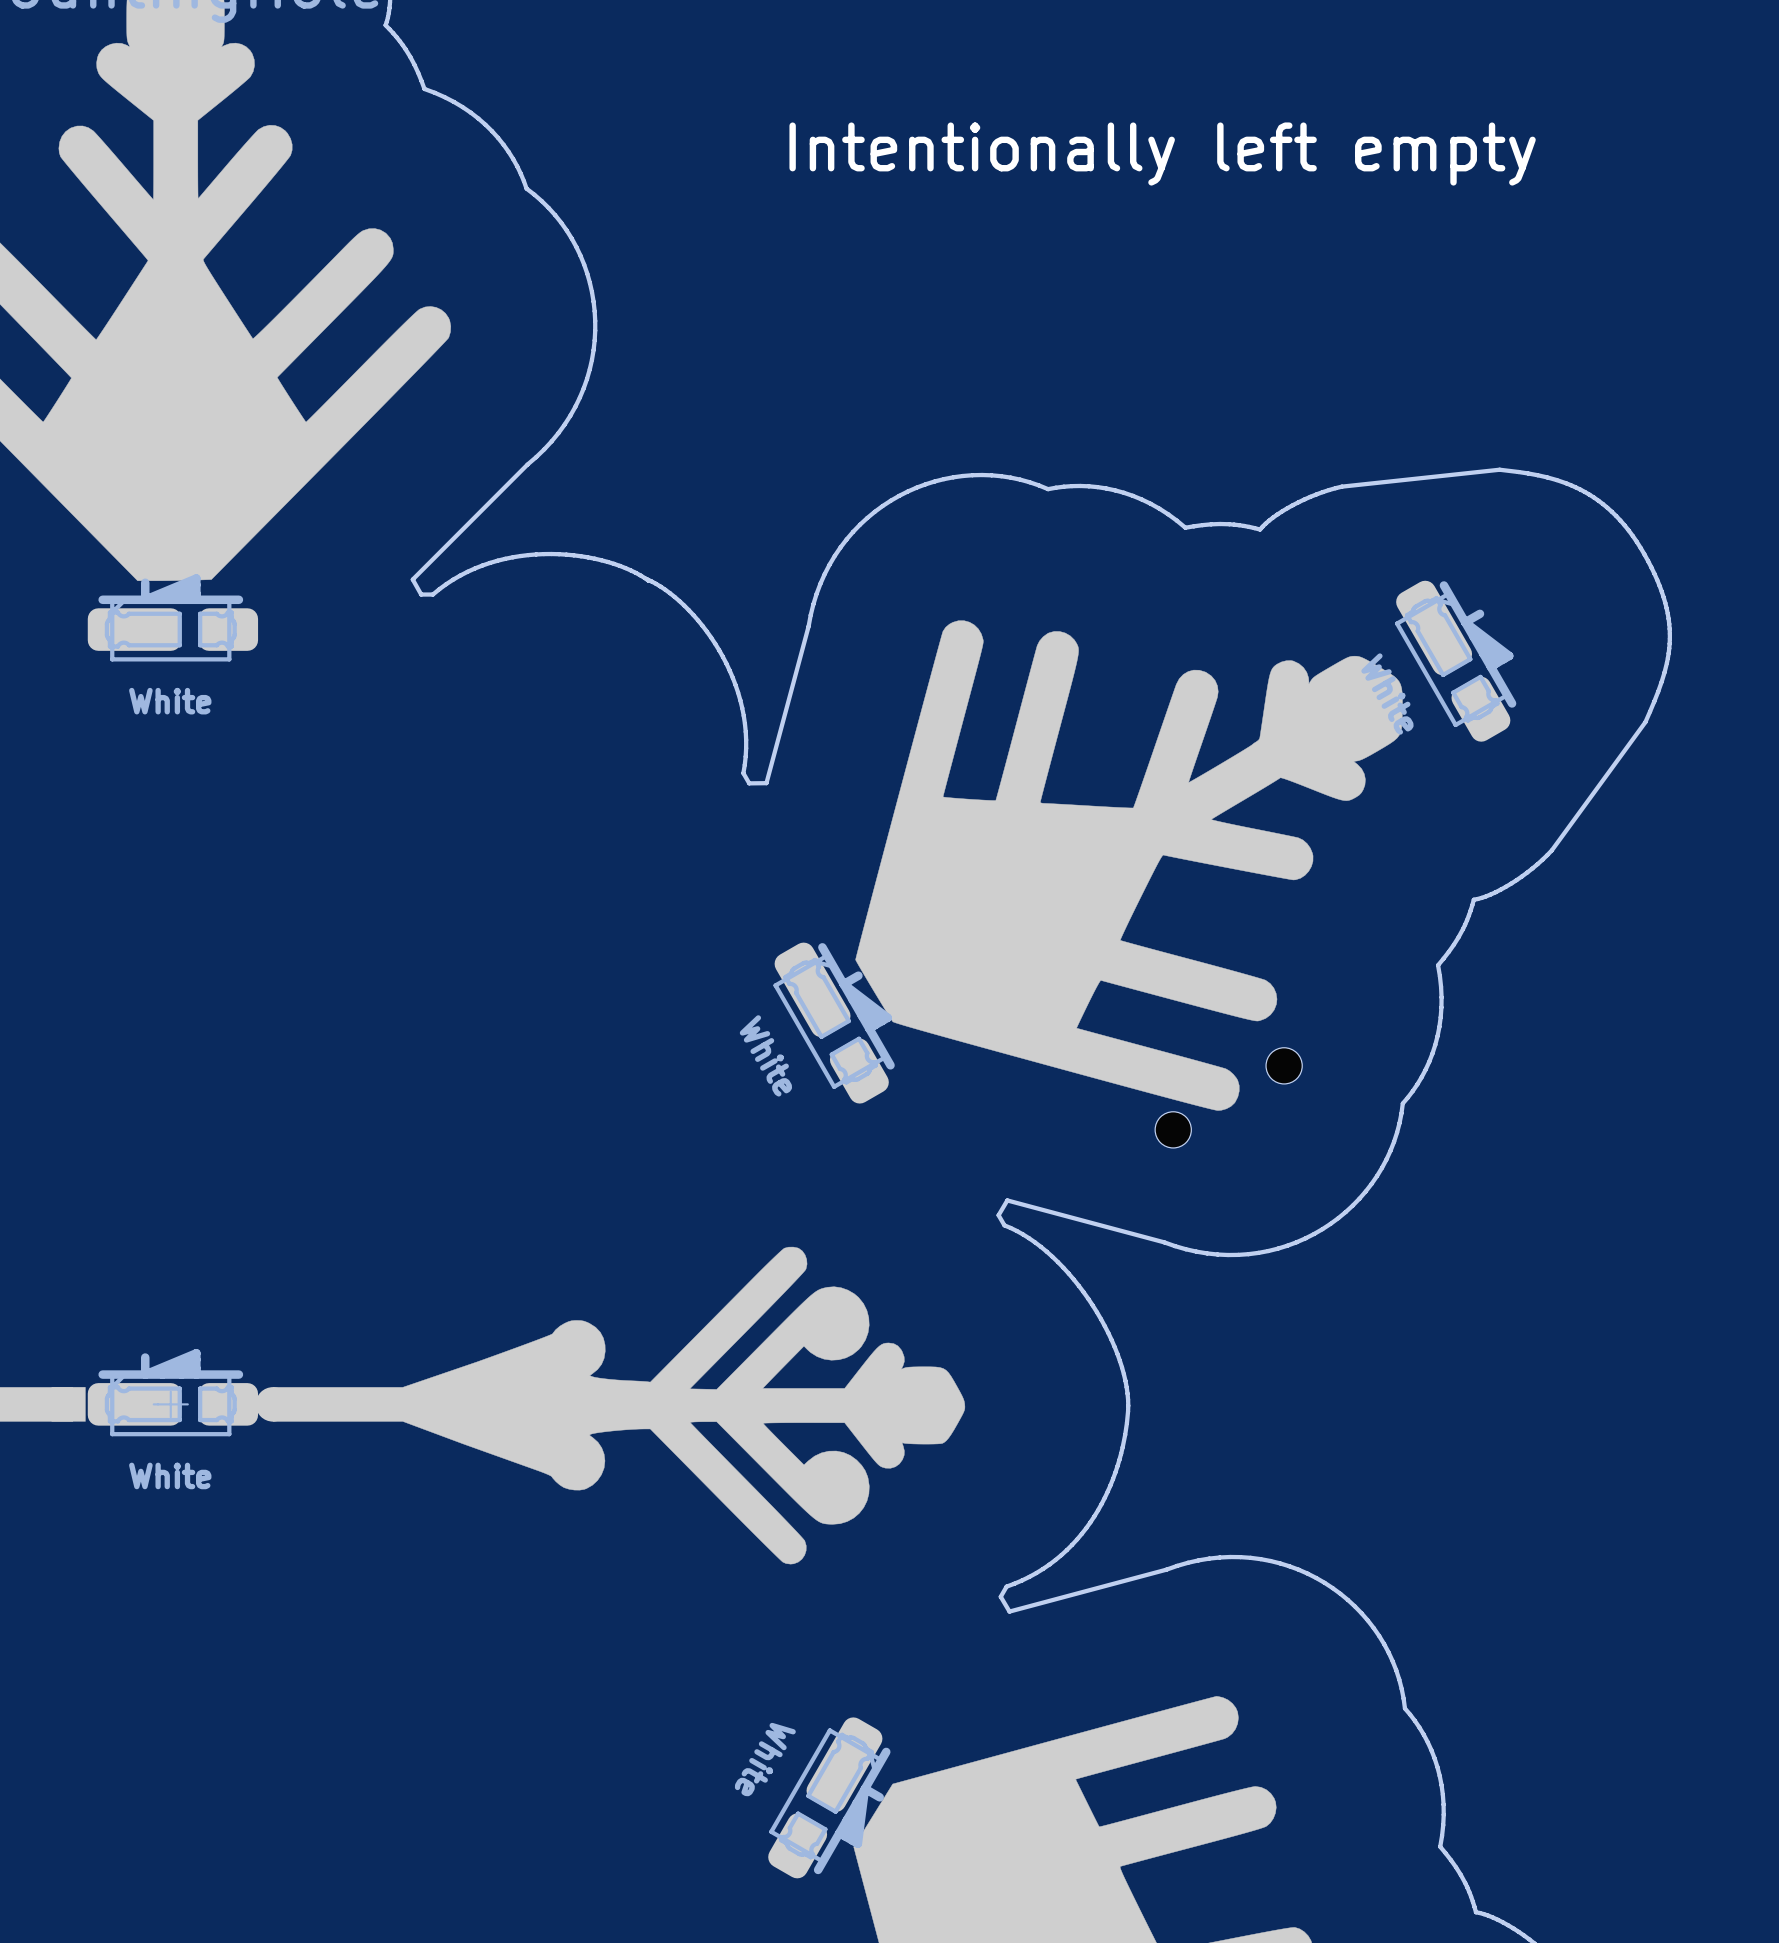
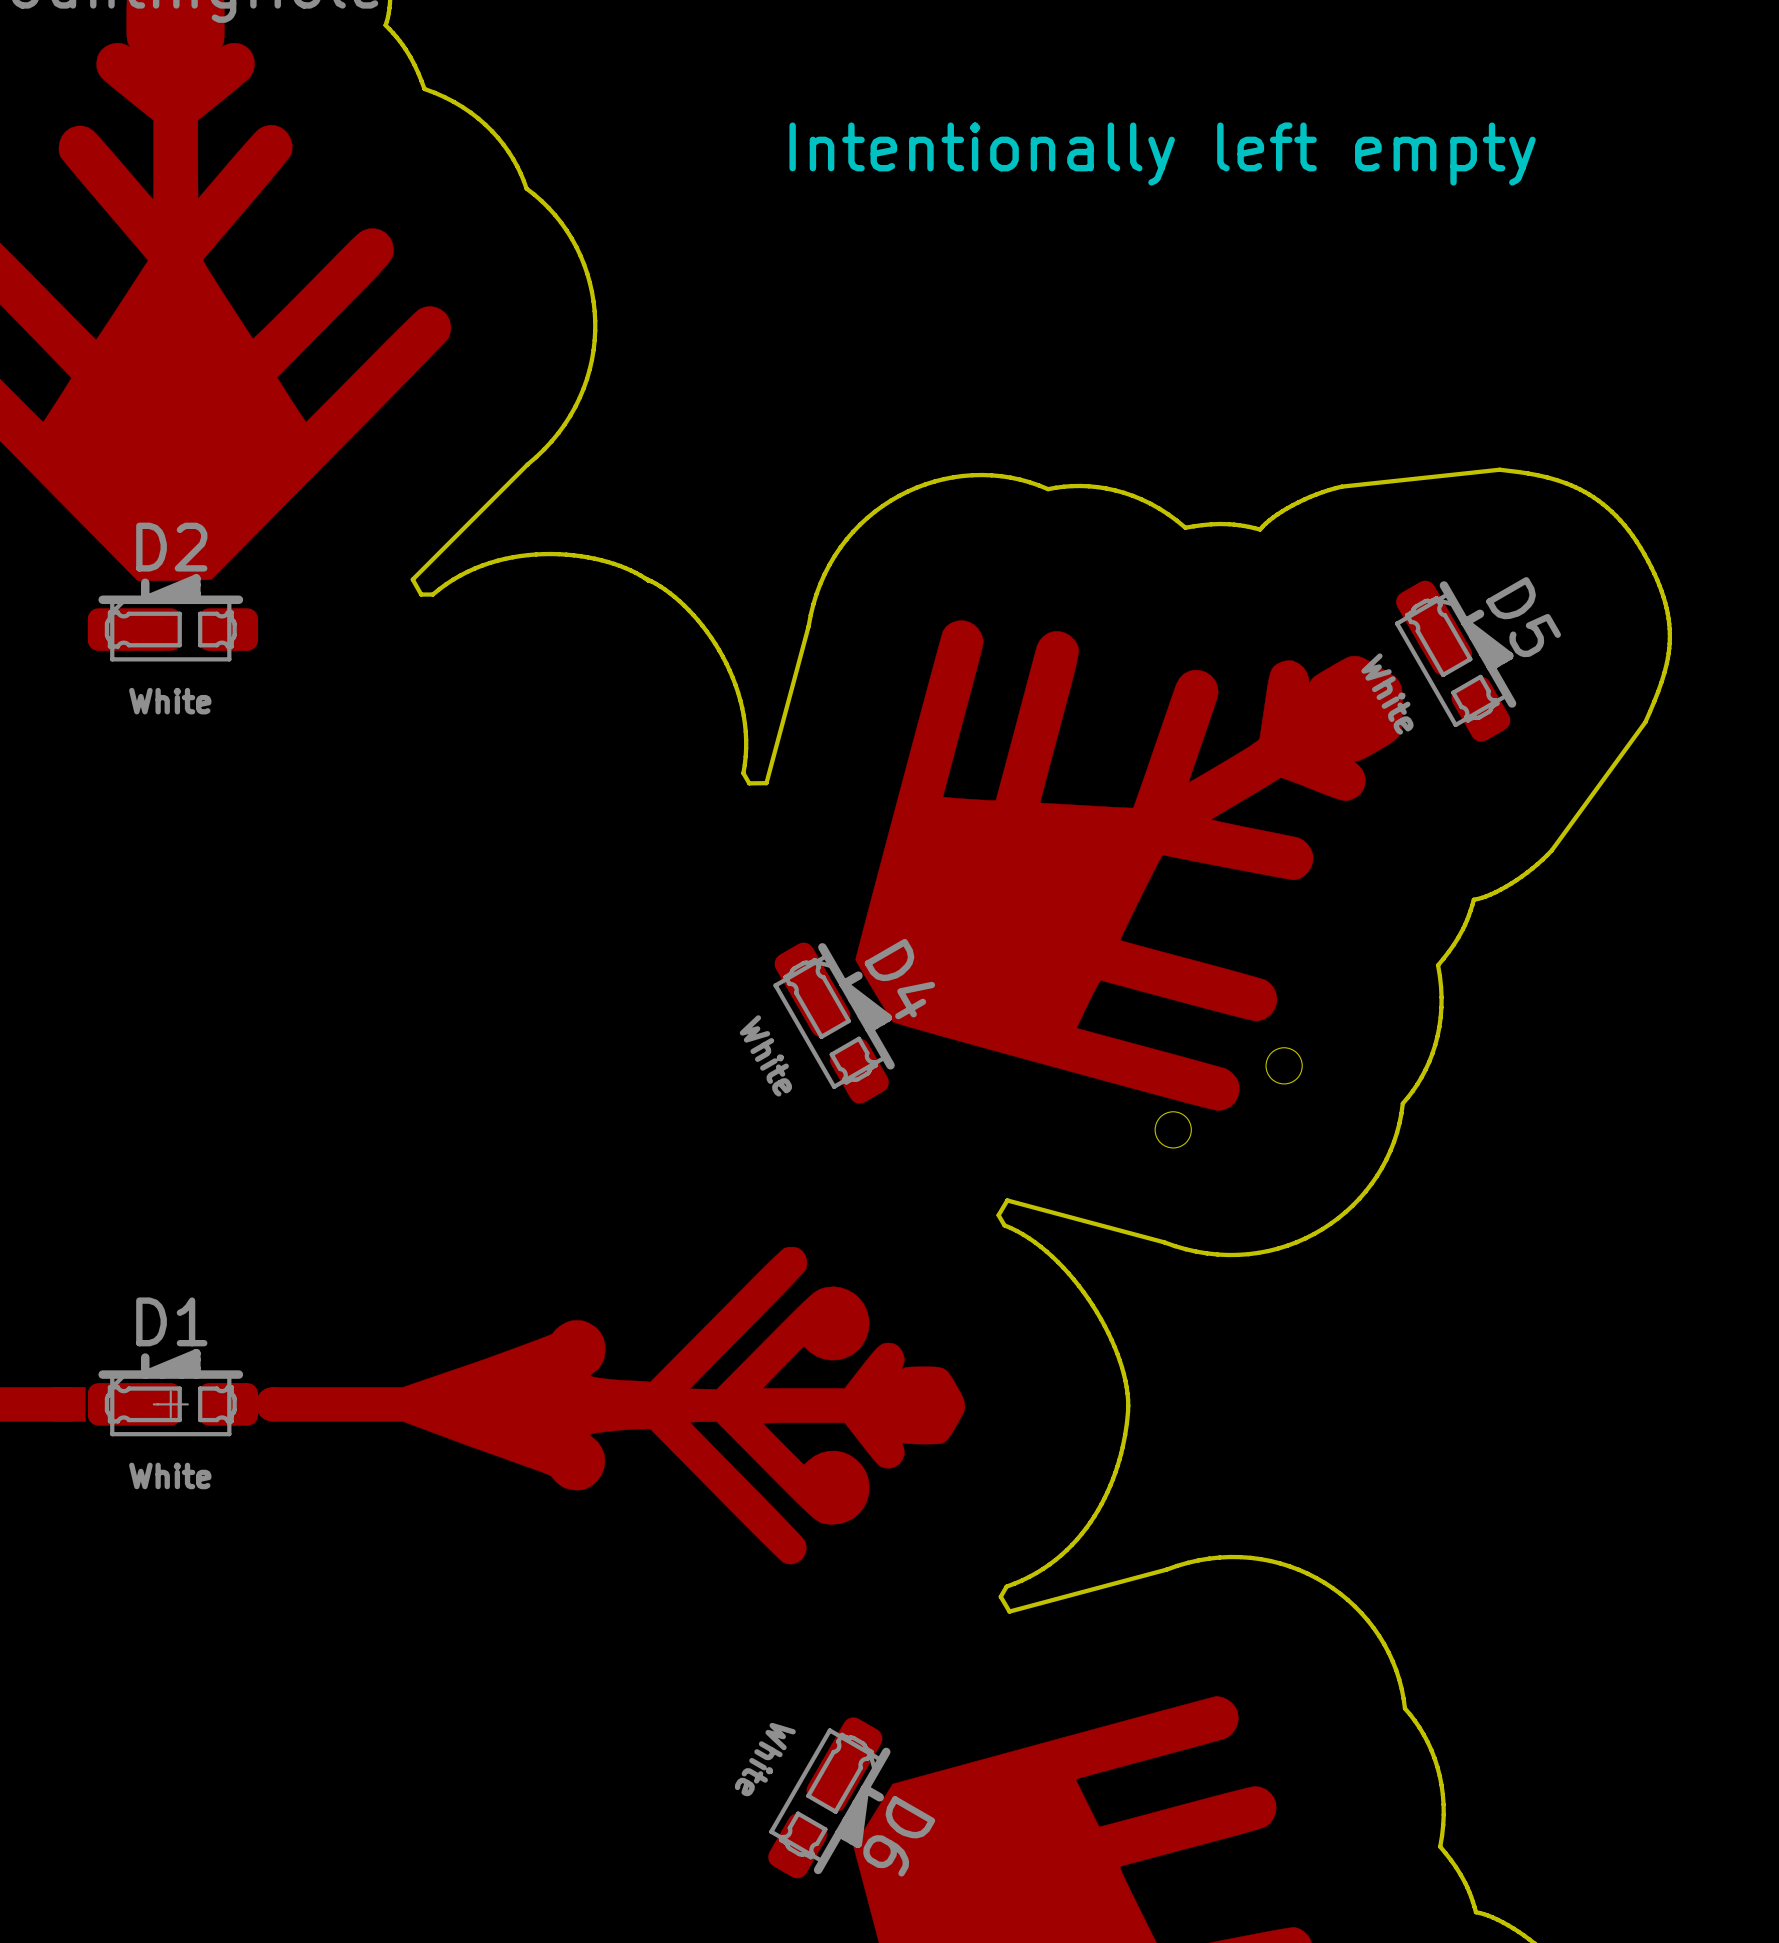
D2 name: none -> D2 (171, 547)
D5 name: none -> D5 (1523, 617)
D4 name: none -> D4 (899, 979)
D1 name: none -> D1 (171, 1321)
D6 name: none -> D6 (899, 1836)

